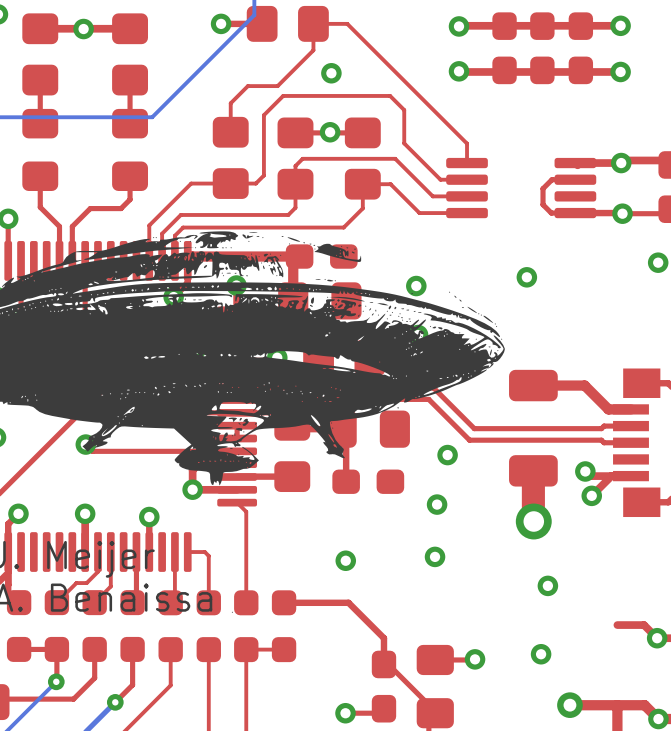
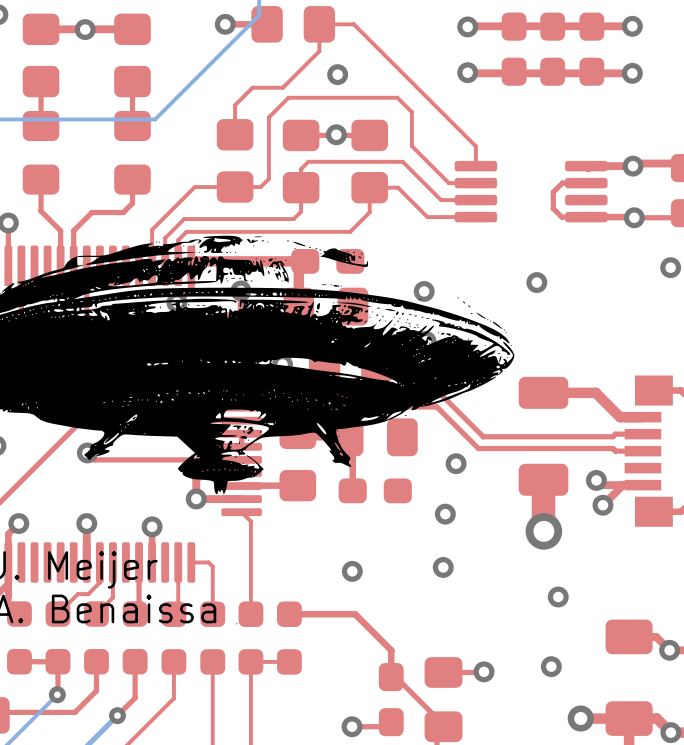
part: none -> (629, 677)

